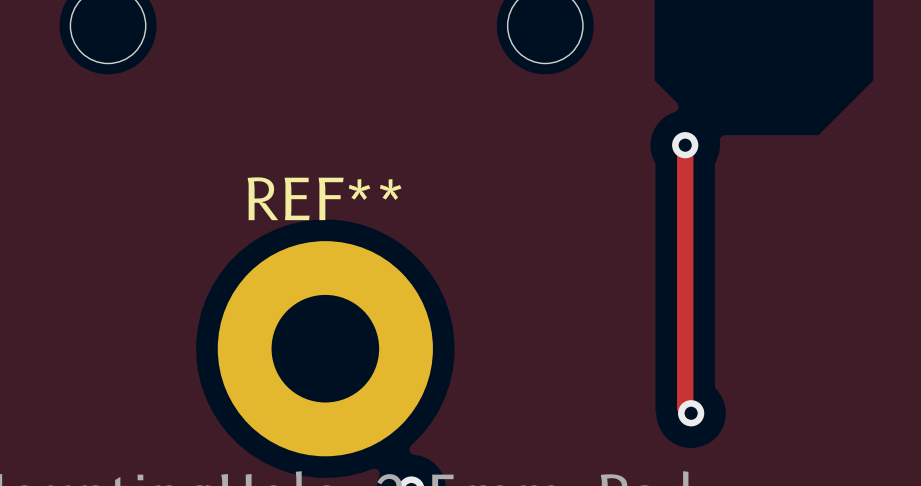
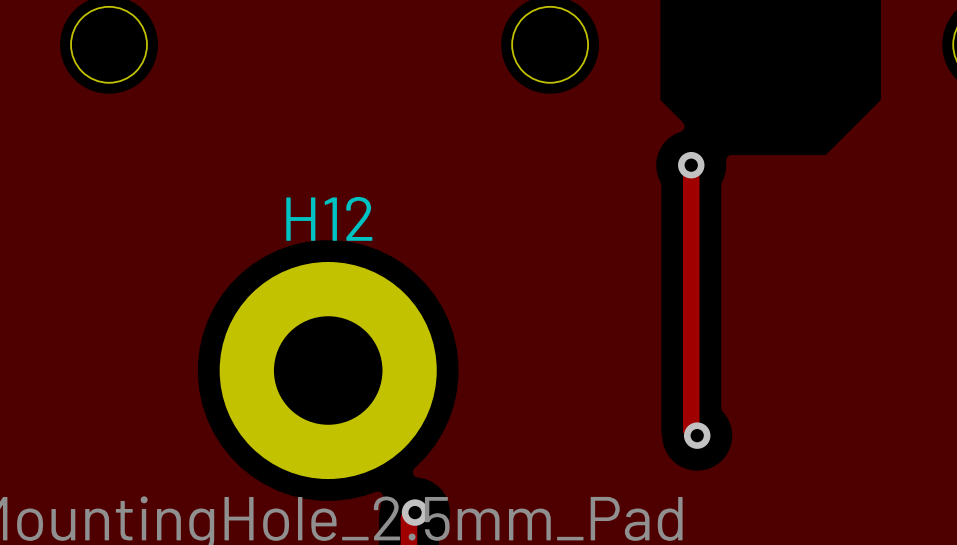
REF** name: REF** (324, 198) -> H12 (329, 218)

